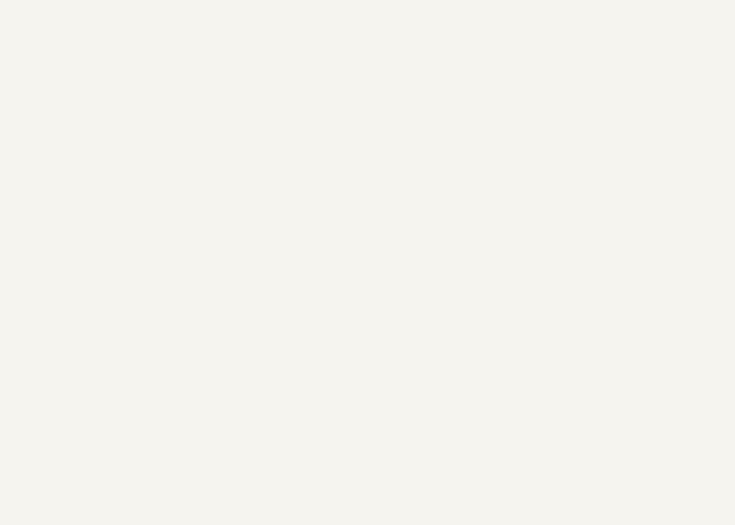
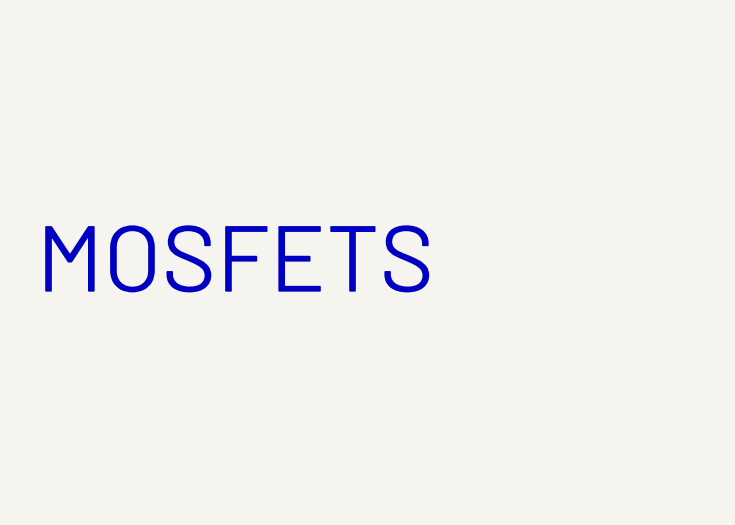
text: none -> MOSFETS (237, 258)

